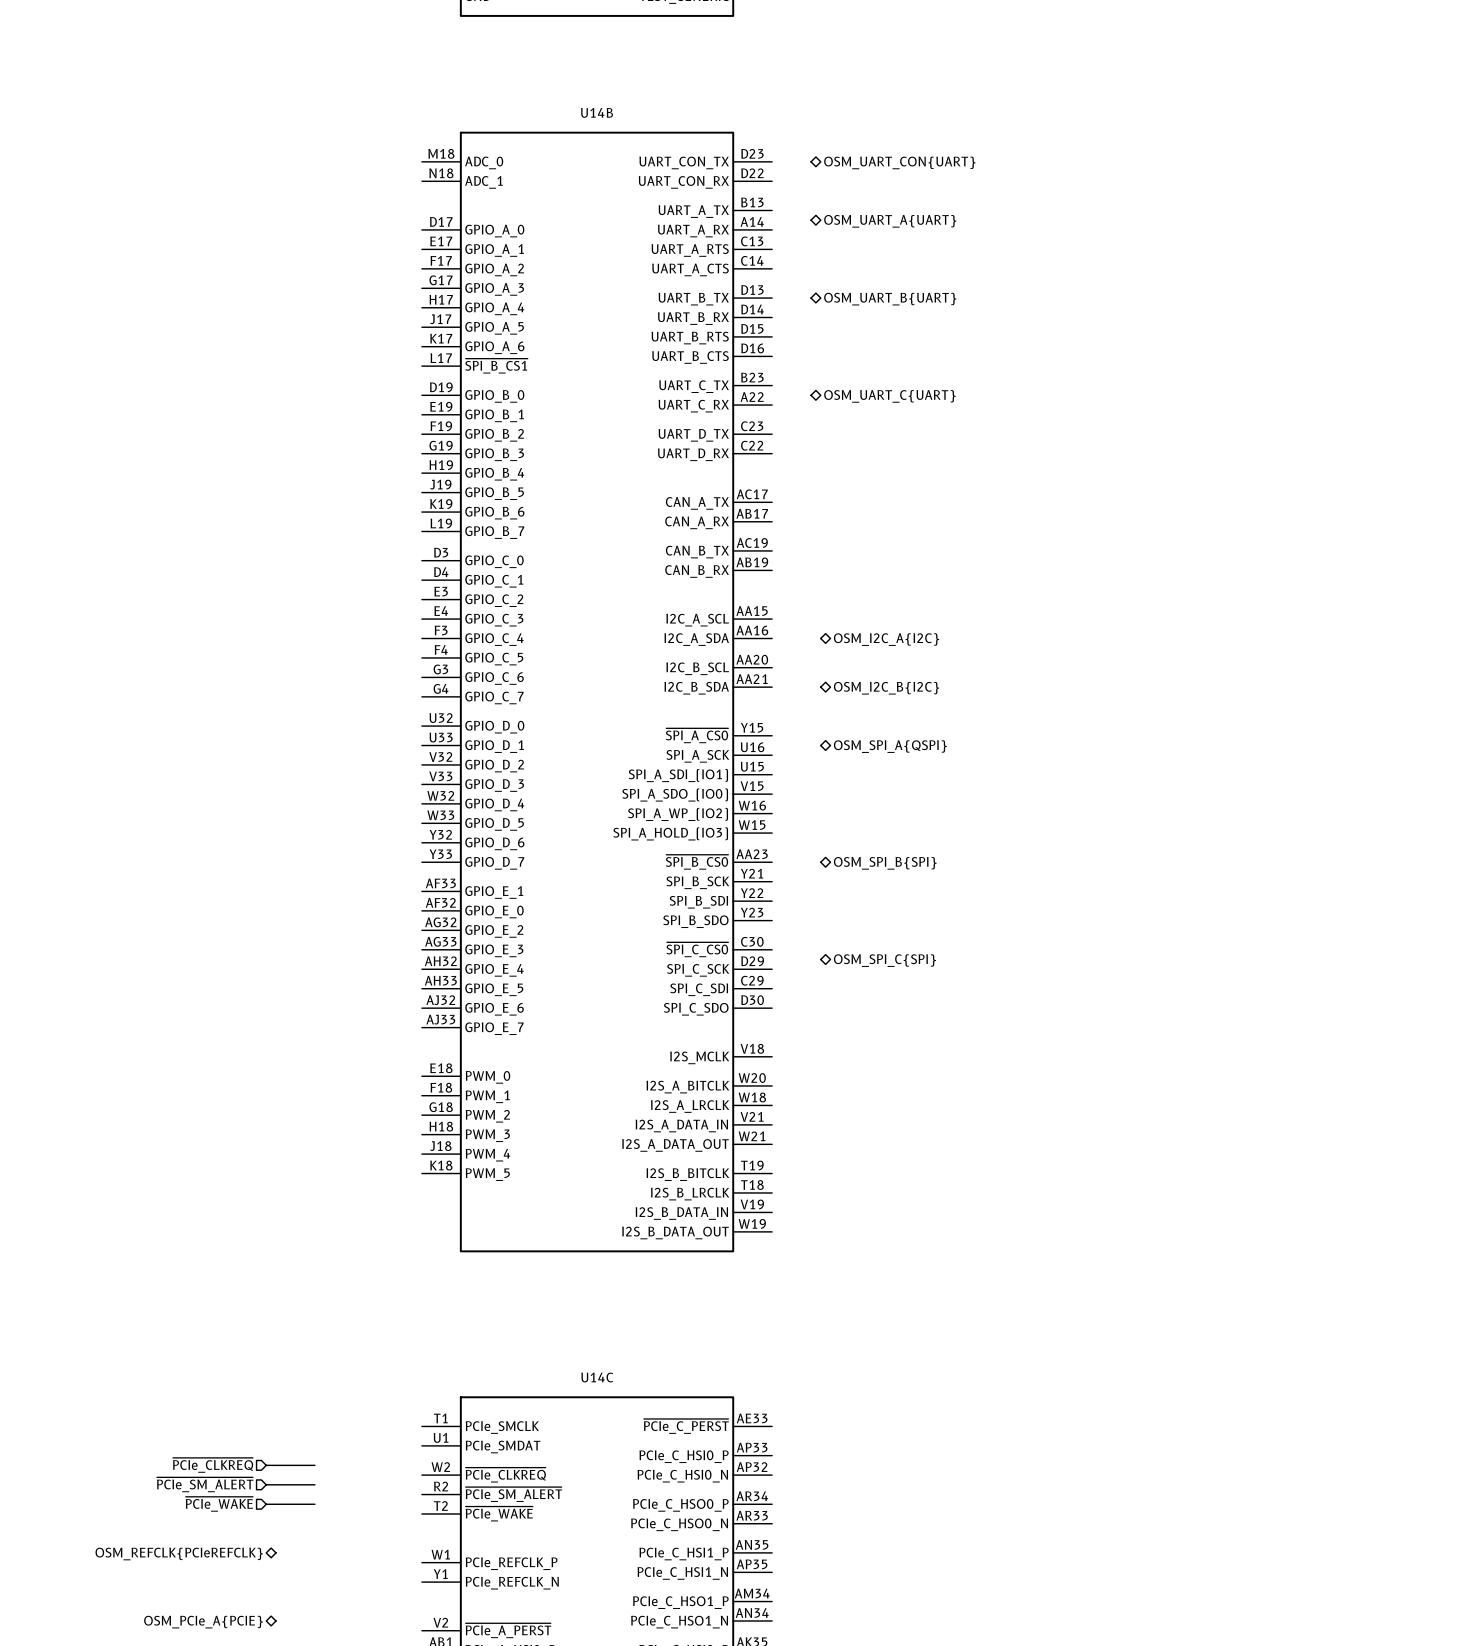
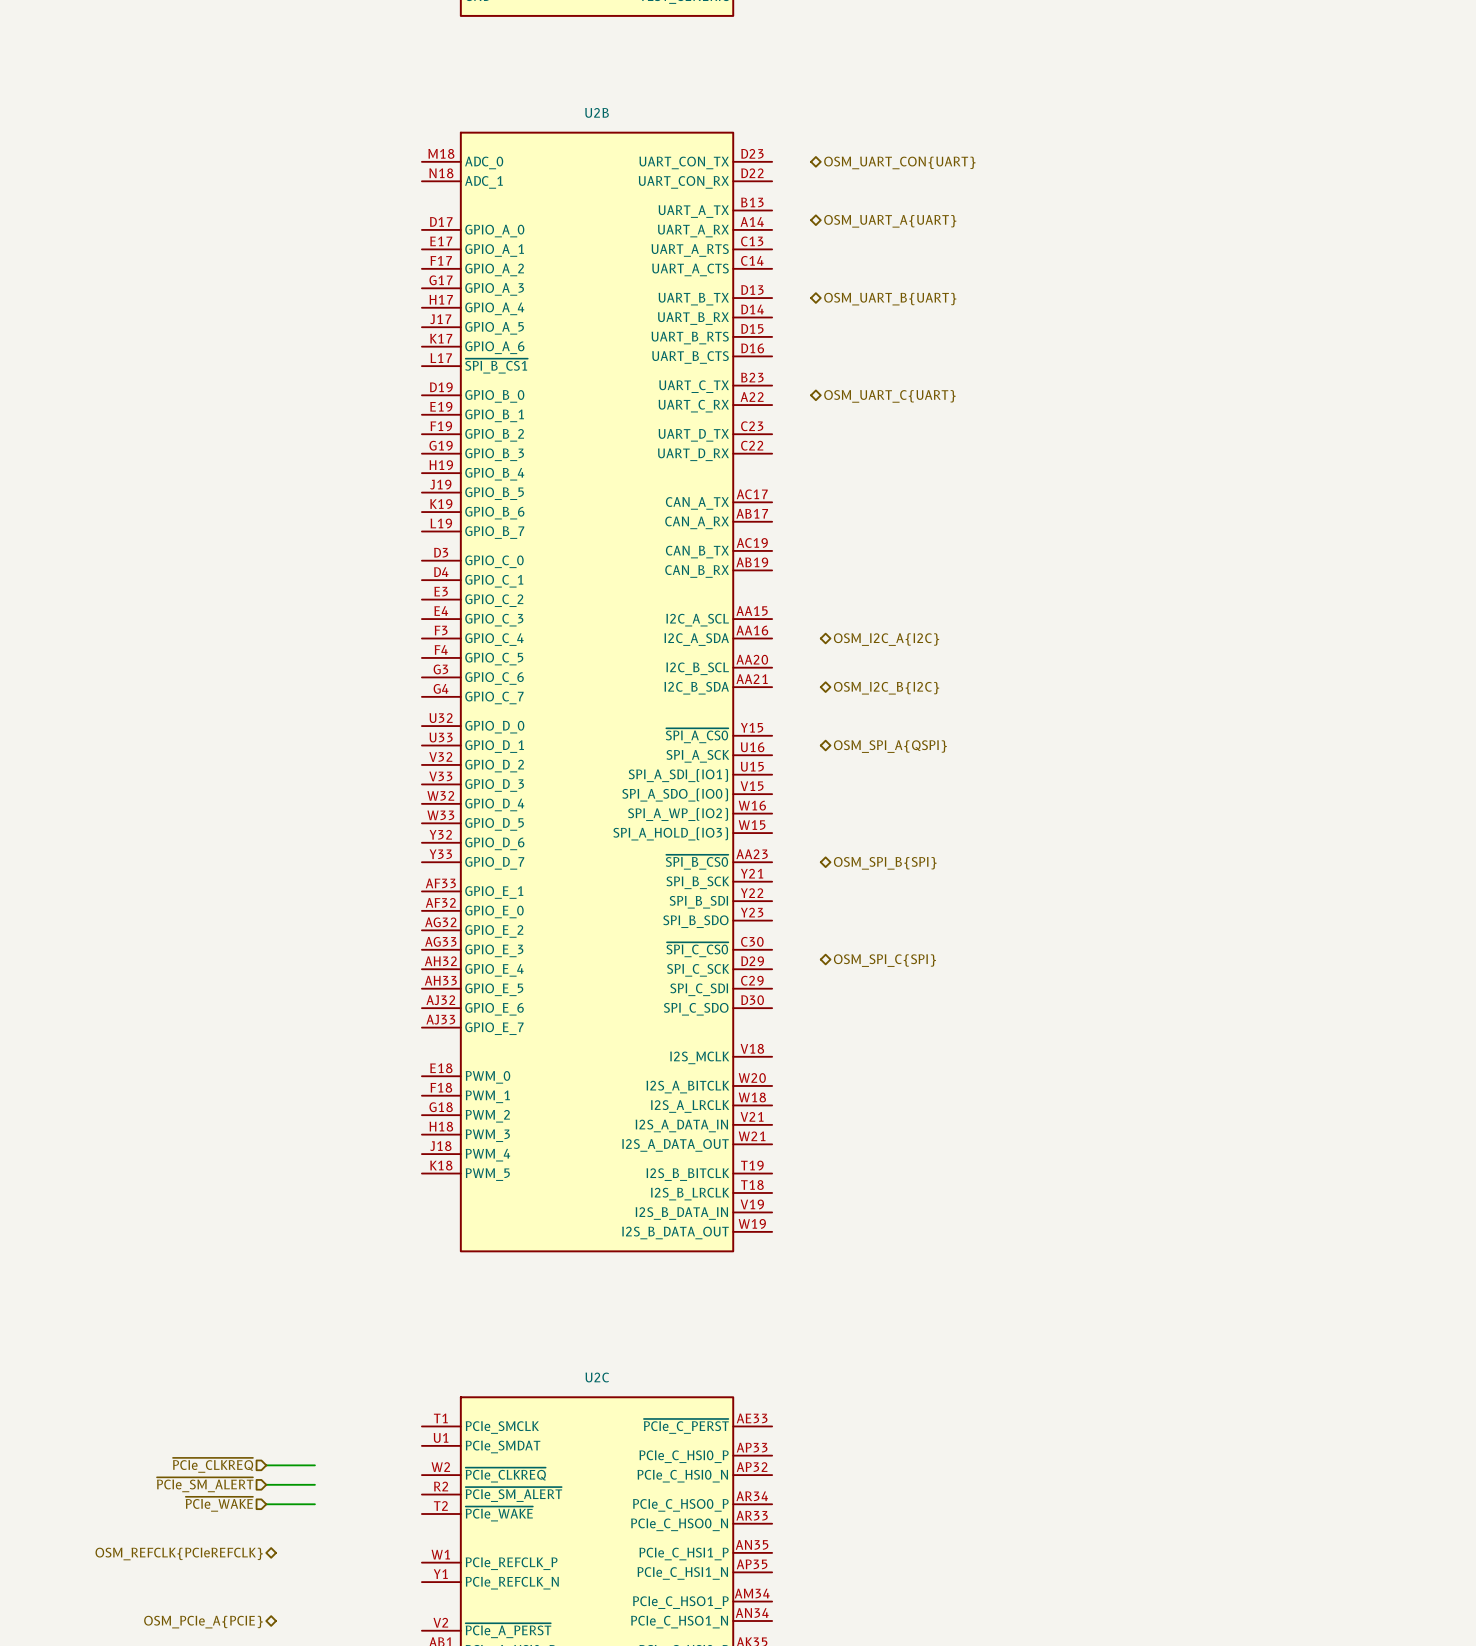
U14B name: U14B (597, 112) -> U2B (597, 112)
U14C name: U14C (597, 1377) -> U2C (597, 1377)

